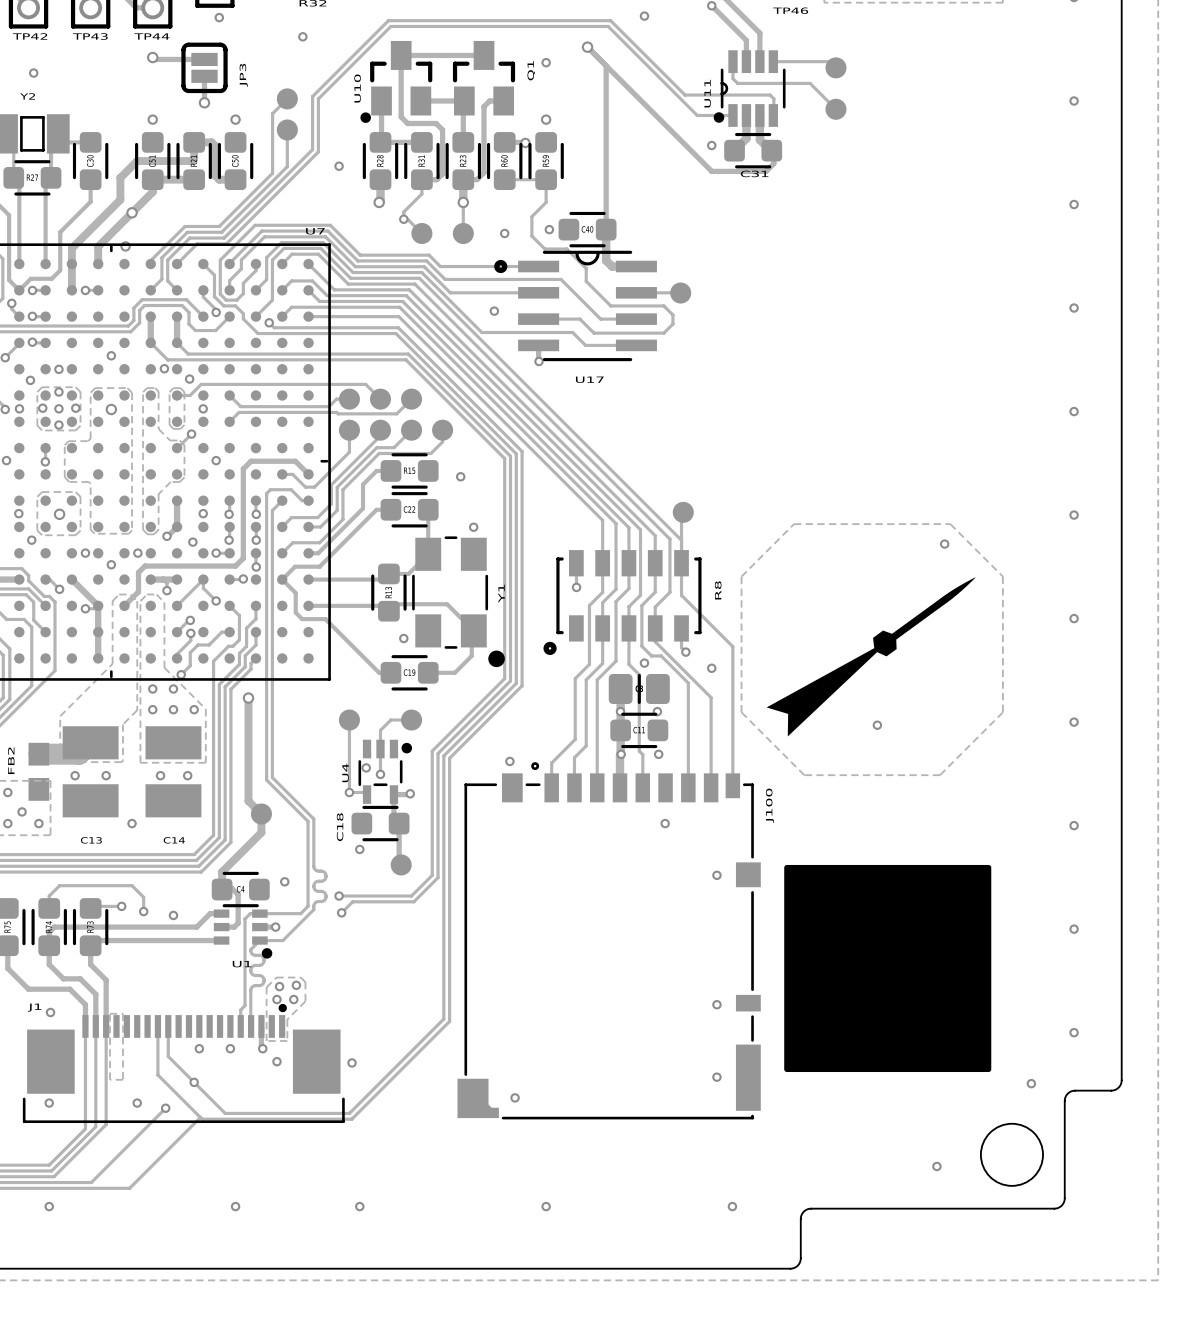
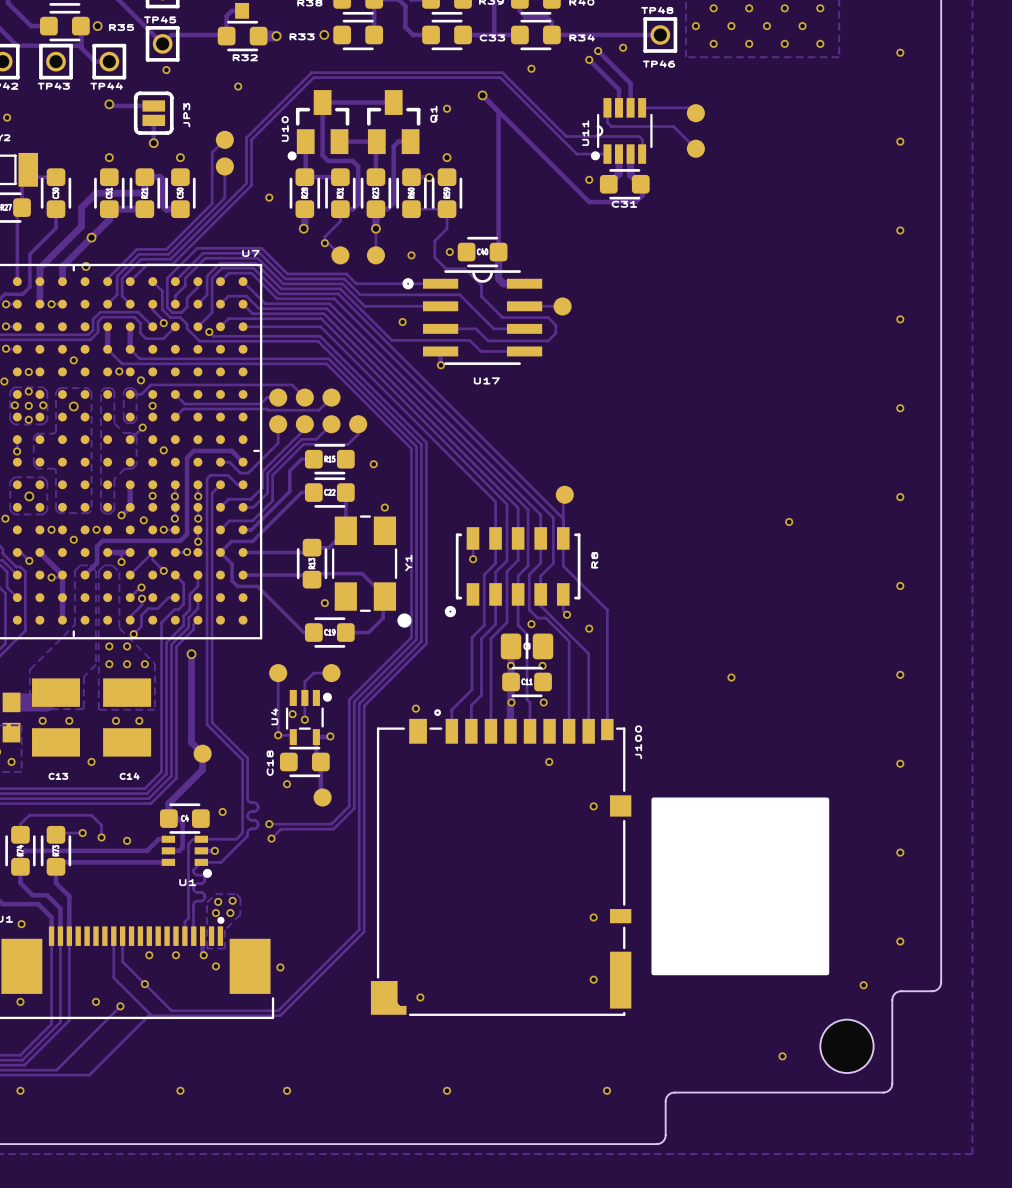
zone outline: (794, 524) (741, 576) (741, 712) (804, 775) (940, 775) (1002, 712) (1002, 576) (950, 524) (794, 524) -> none
drawing: [766, 577, 976, 737] -> none
zone outline: (110, 1013) (110, 1079) (123, 1079) (123, 1013) (110, 1013) -> none

